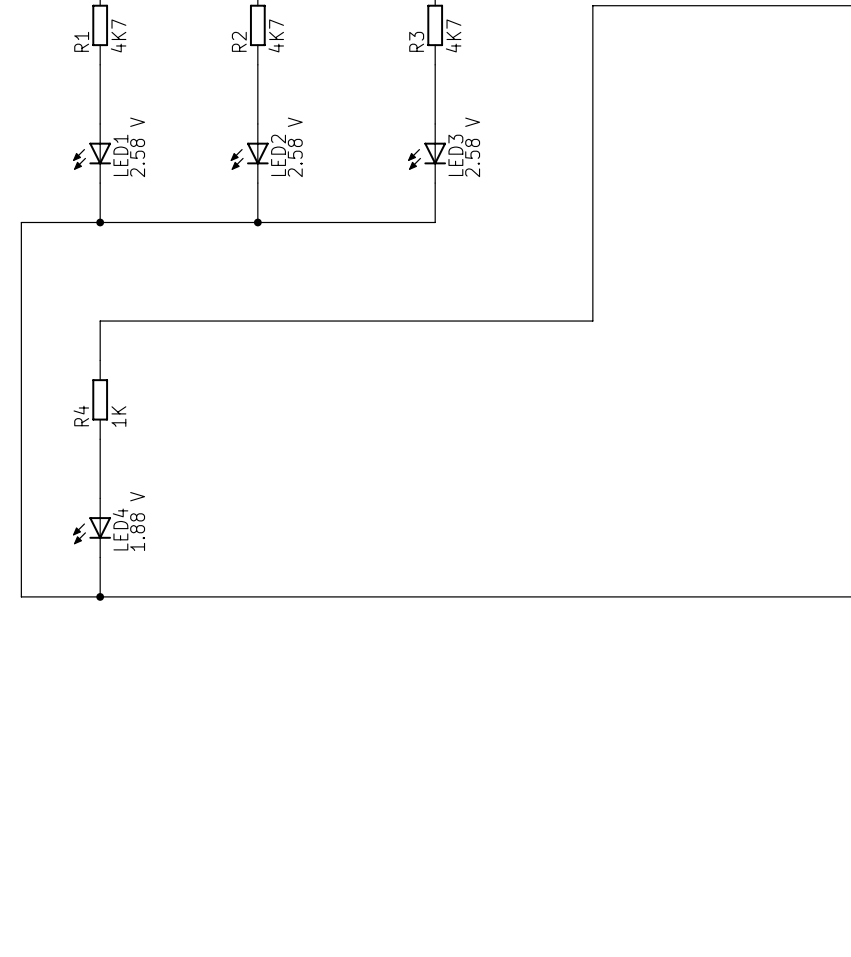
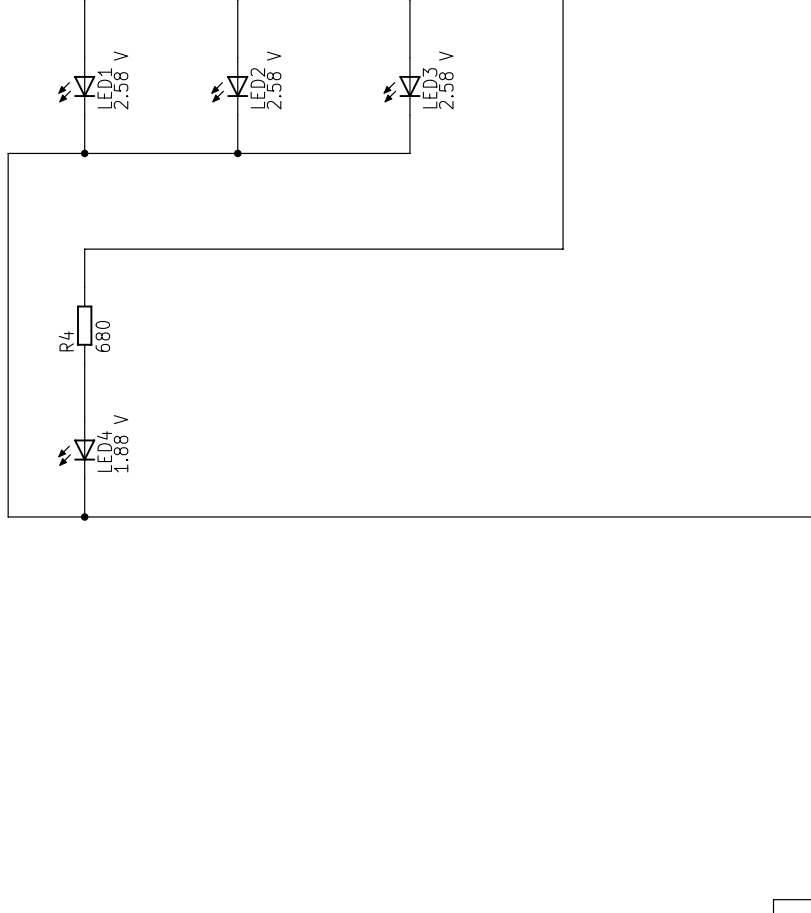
R4 value: 1K (118, 416) -> 680 (102, 336)

